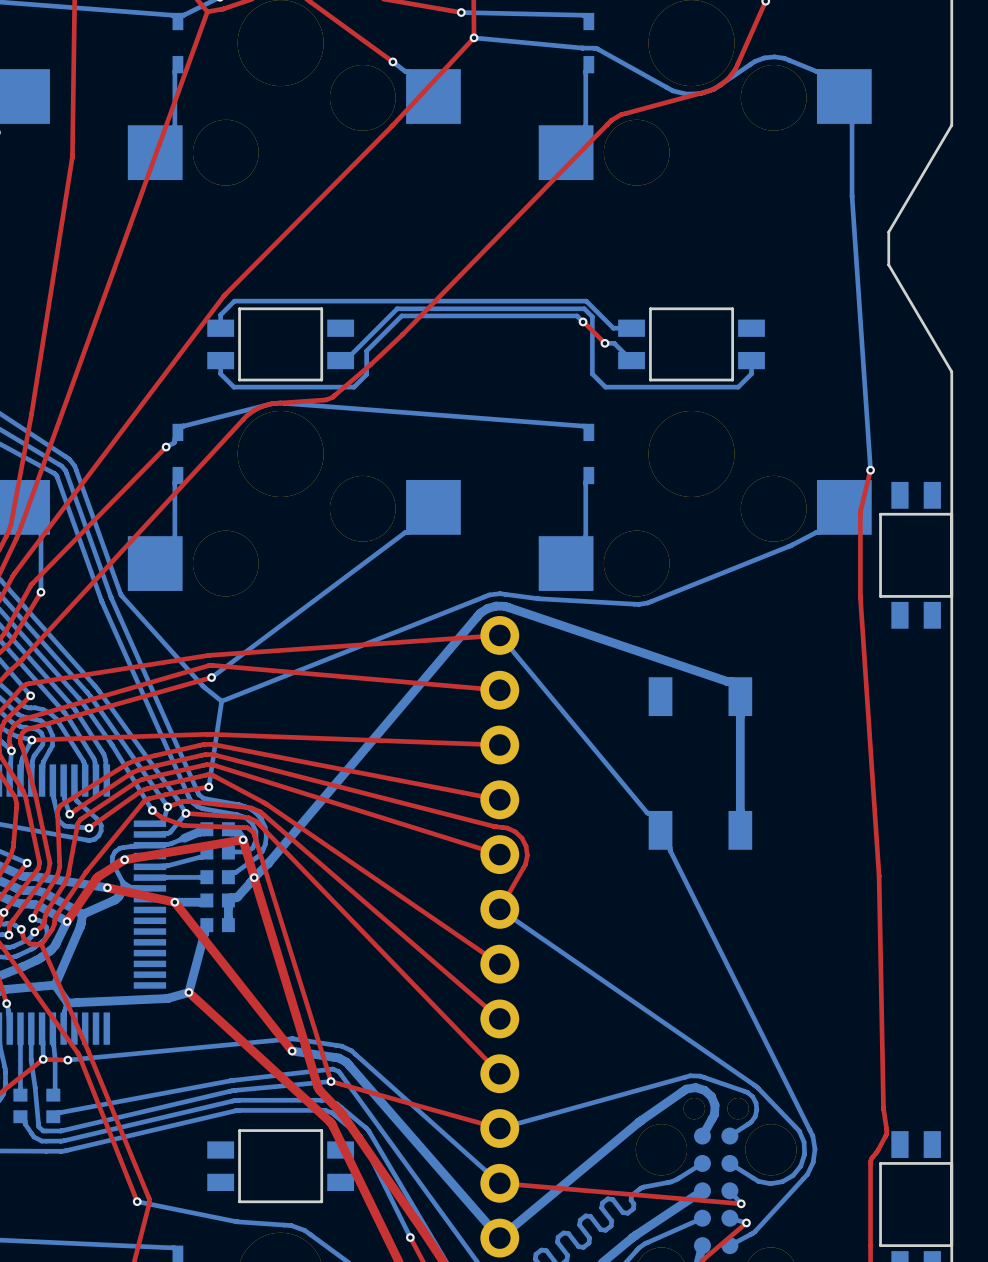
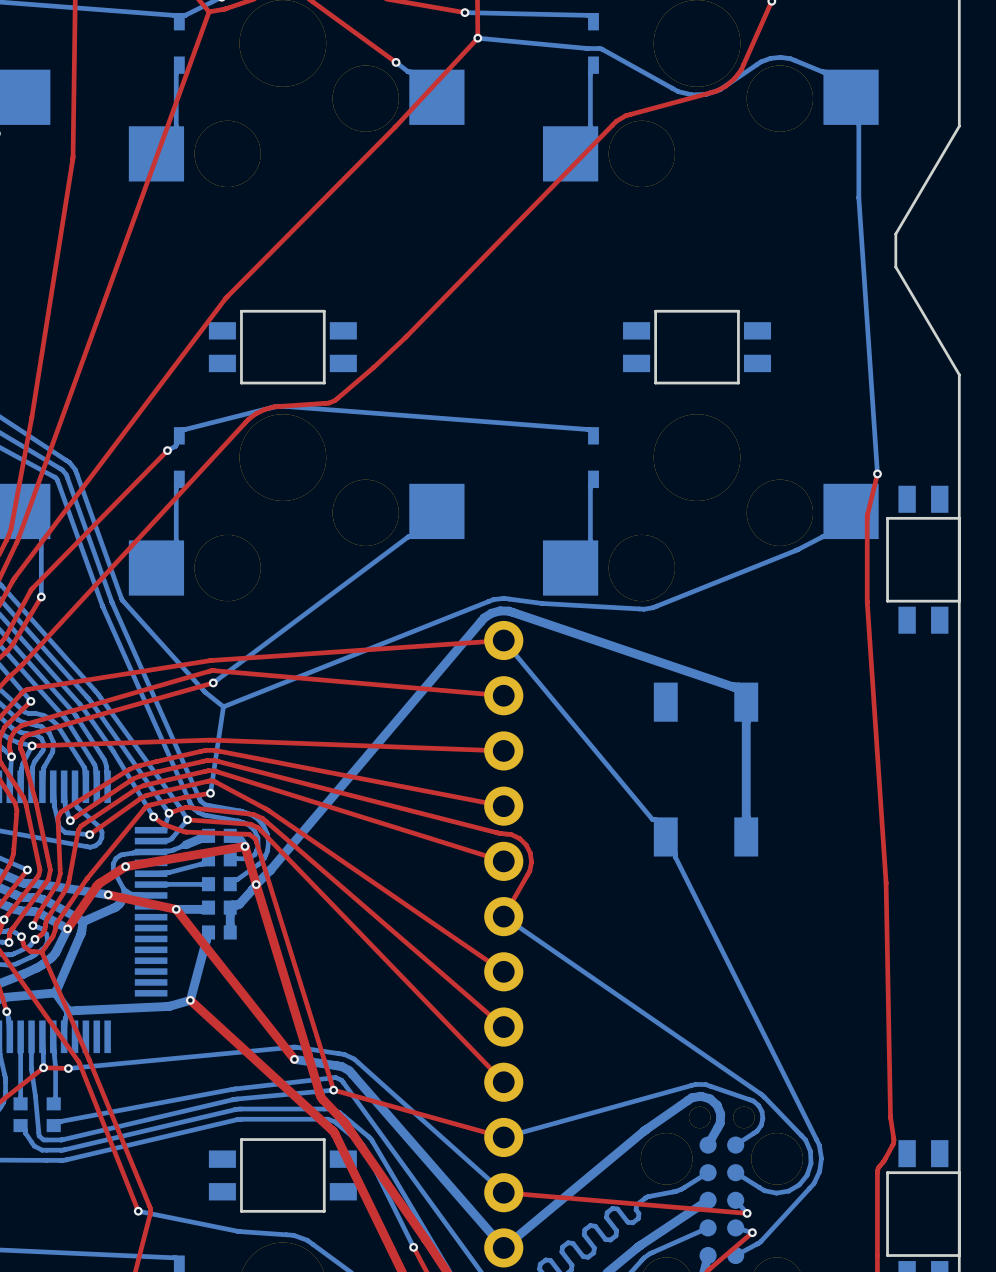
bottom track: (583, 321) (577, 315) (401, 315) (366, 350) (366, 374) (354, 387) (233, 387) (220, 373) (220, 360) -> none
top track: (583, 321) (604, 343) -> none
via: (583, 321) -> none
bottom track: (220, 328) (220, 314) (234, 301) (586, 301) (613, 328) (631, 328) -> none
bottom track: (604, 343) (614, 343) (631, 360) -> none
via: (604, 343) -> none
bottom track: (340, 360) (345, 360) (397, 308) (584, 308) (592, 316) (592, 373) (605, 387) (738, 387) (751, 373) (751, 360) -> none

